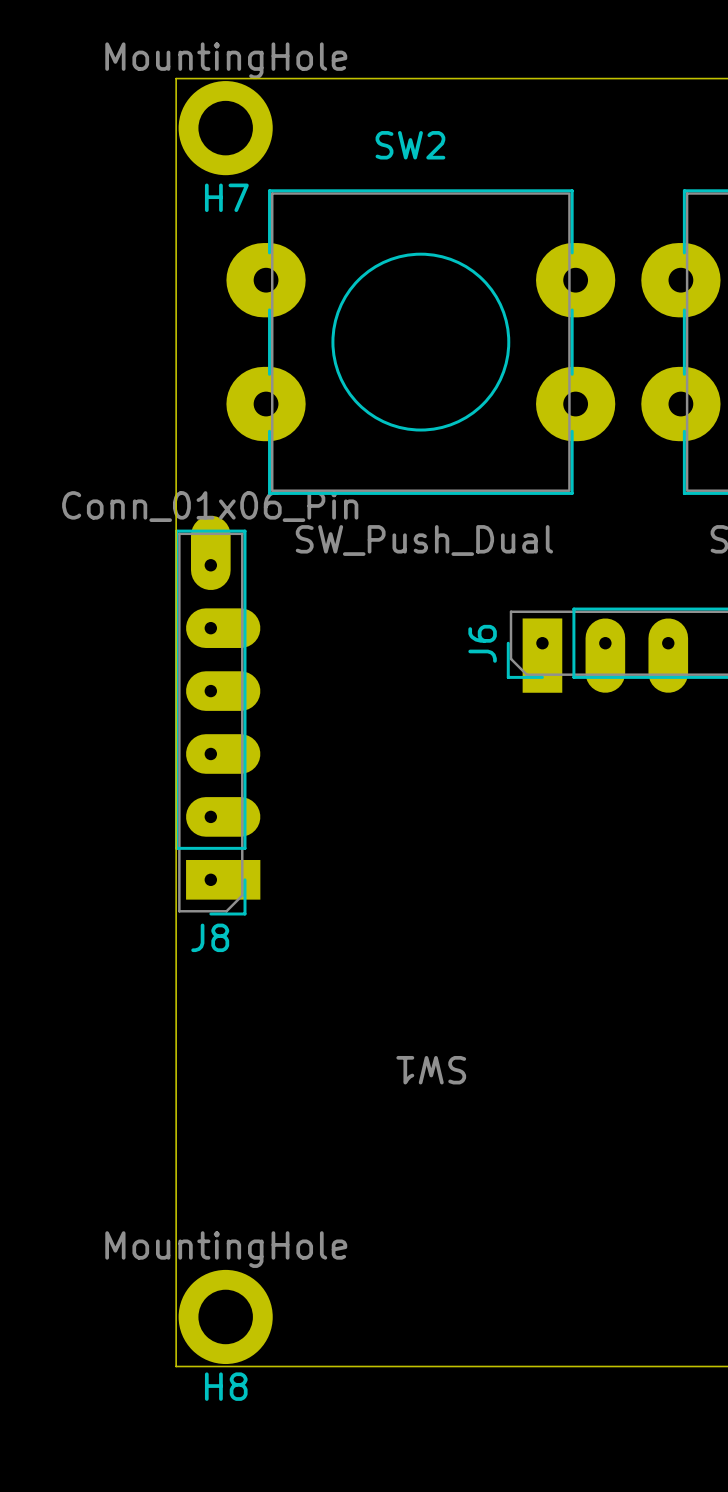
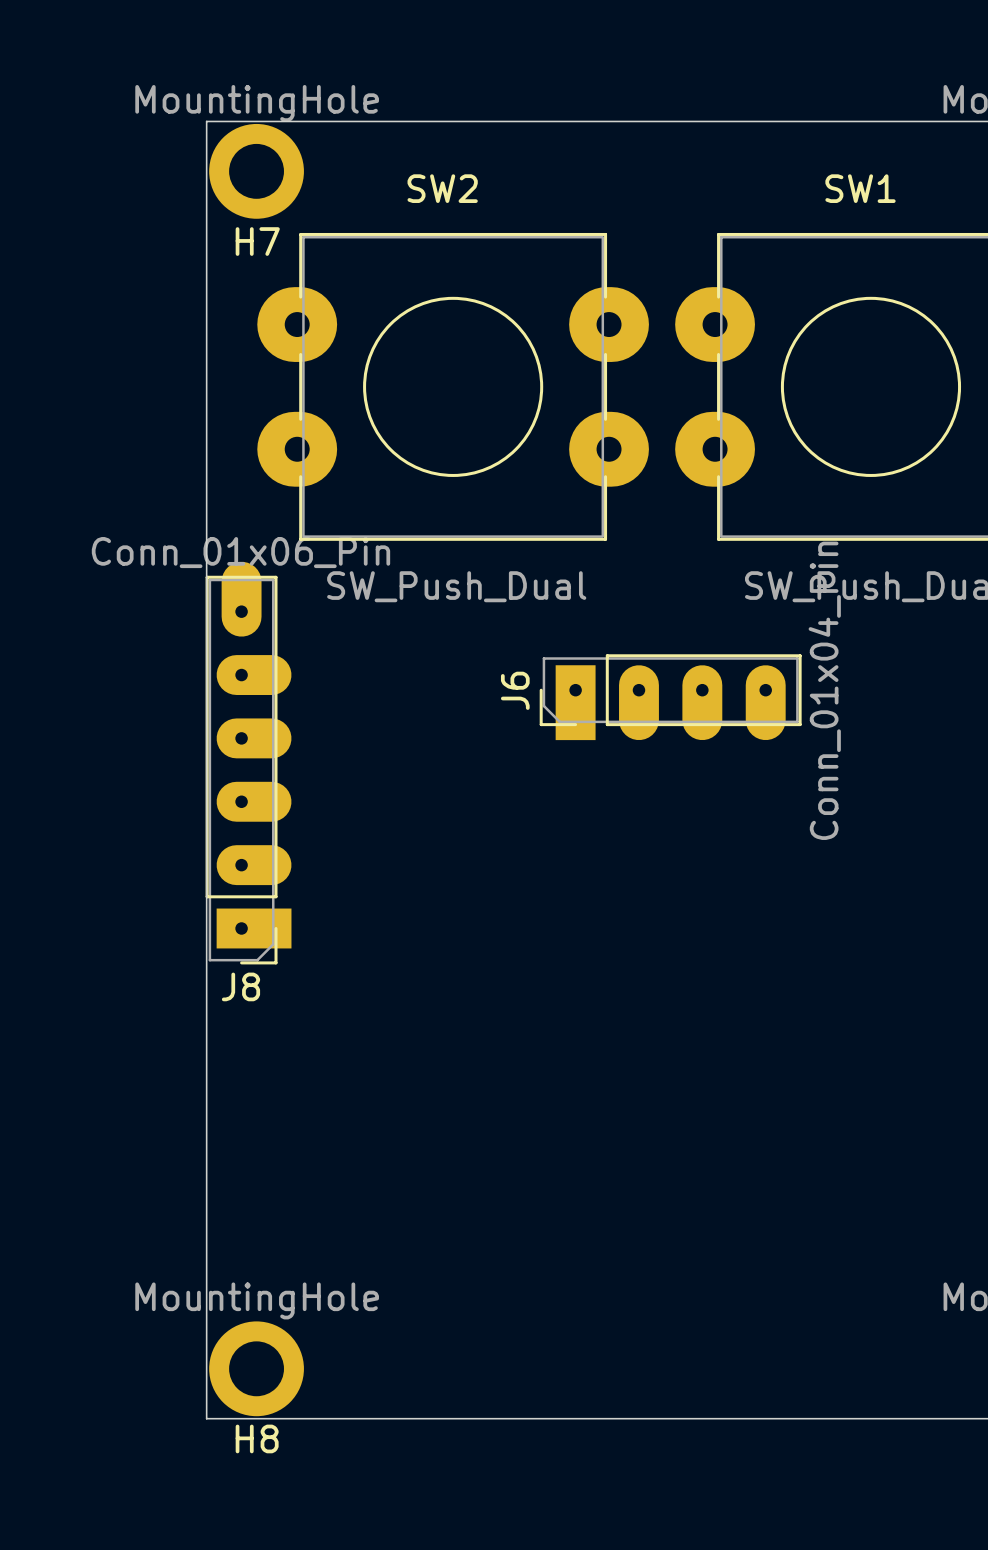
text: SW1 (431, 1070) -> none

